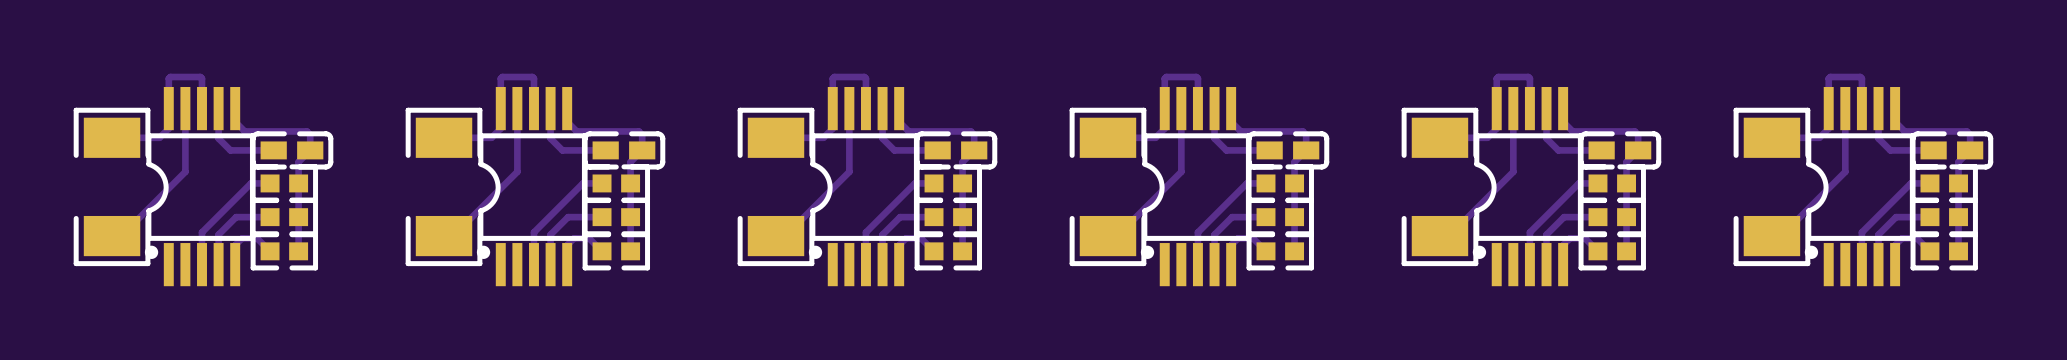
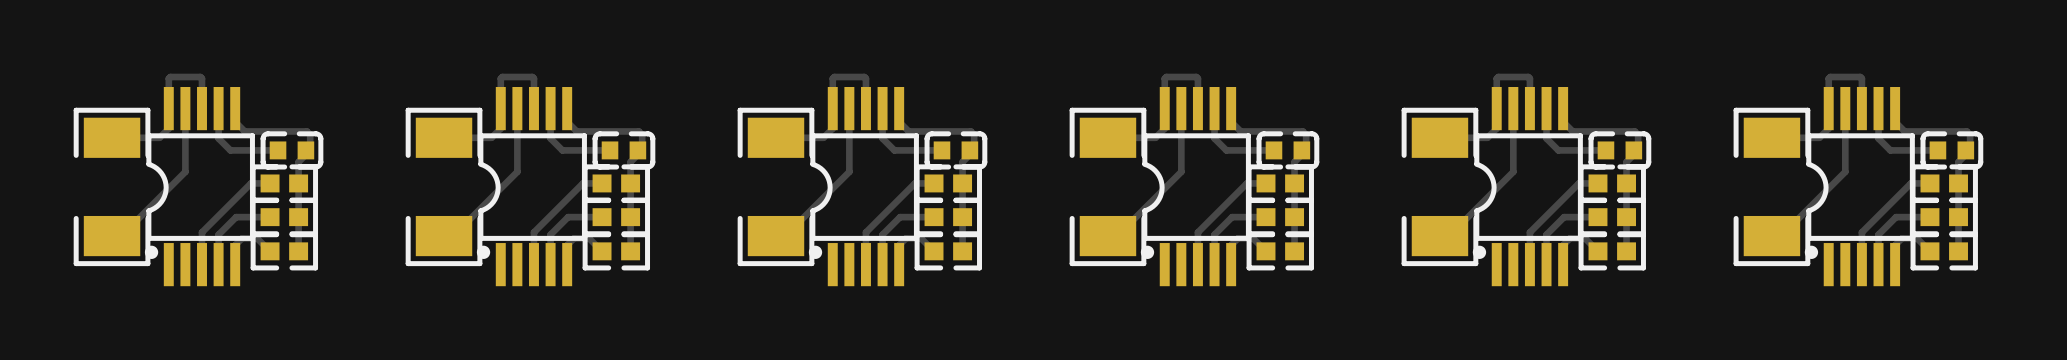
part footprint: [250, 131, 334, 170] -> [260, 131, 324, 170]
part footprint: [582, 131, 666, 170] -> [592, 131, 656, 170]
part footprint: [914, 131, 998, 170] -> [924, 131, 988, 170]
part footprint: [1246, 131, 1330, 170] -> [1256, 131, 1320, 170]
part footprint: [1578, 131, 1662, 170] -> [1588, 131, 1652, 170]
part footprint: [1910, 131, 1994, 170] -> [1920, 131, 1984, 170]

